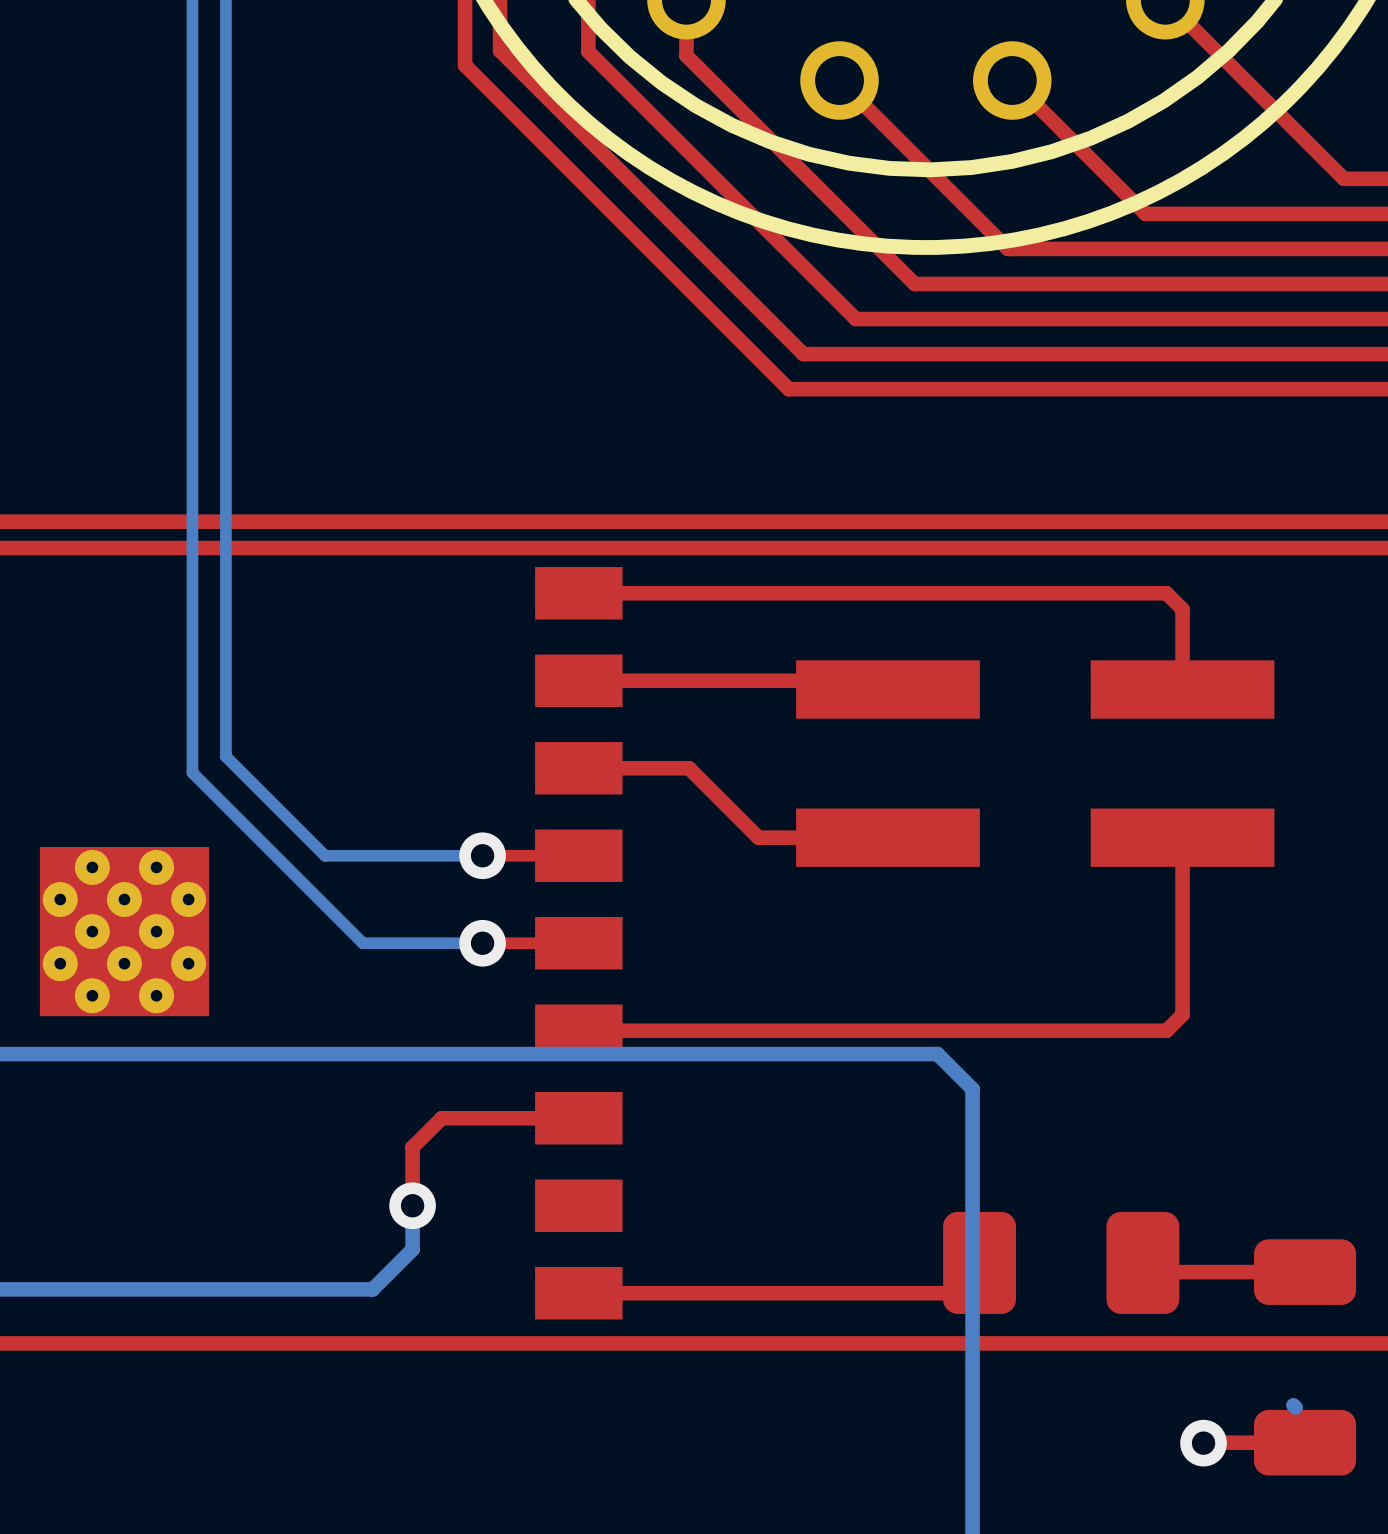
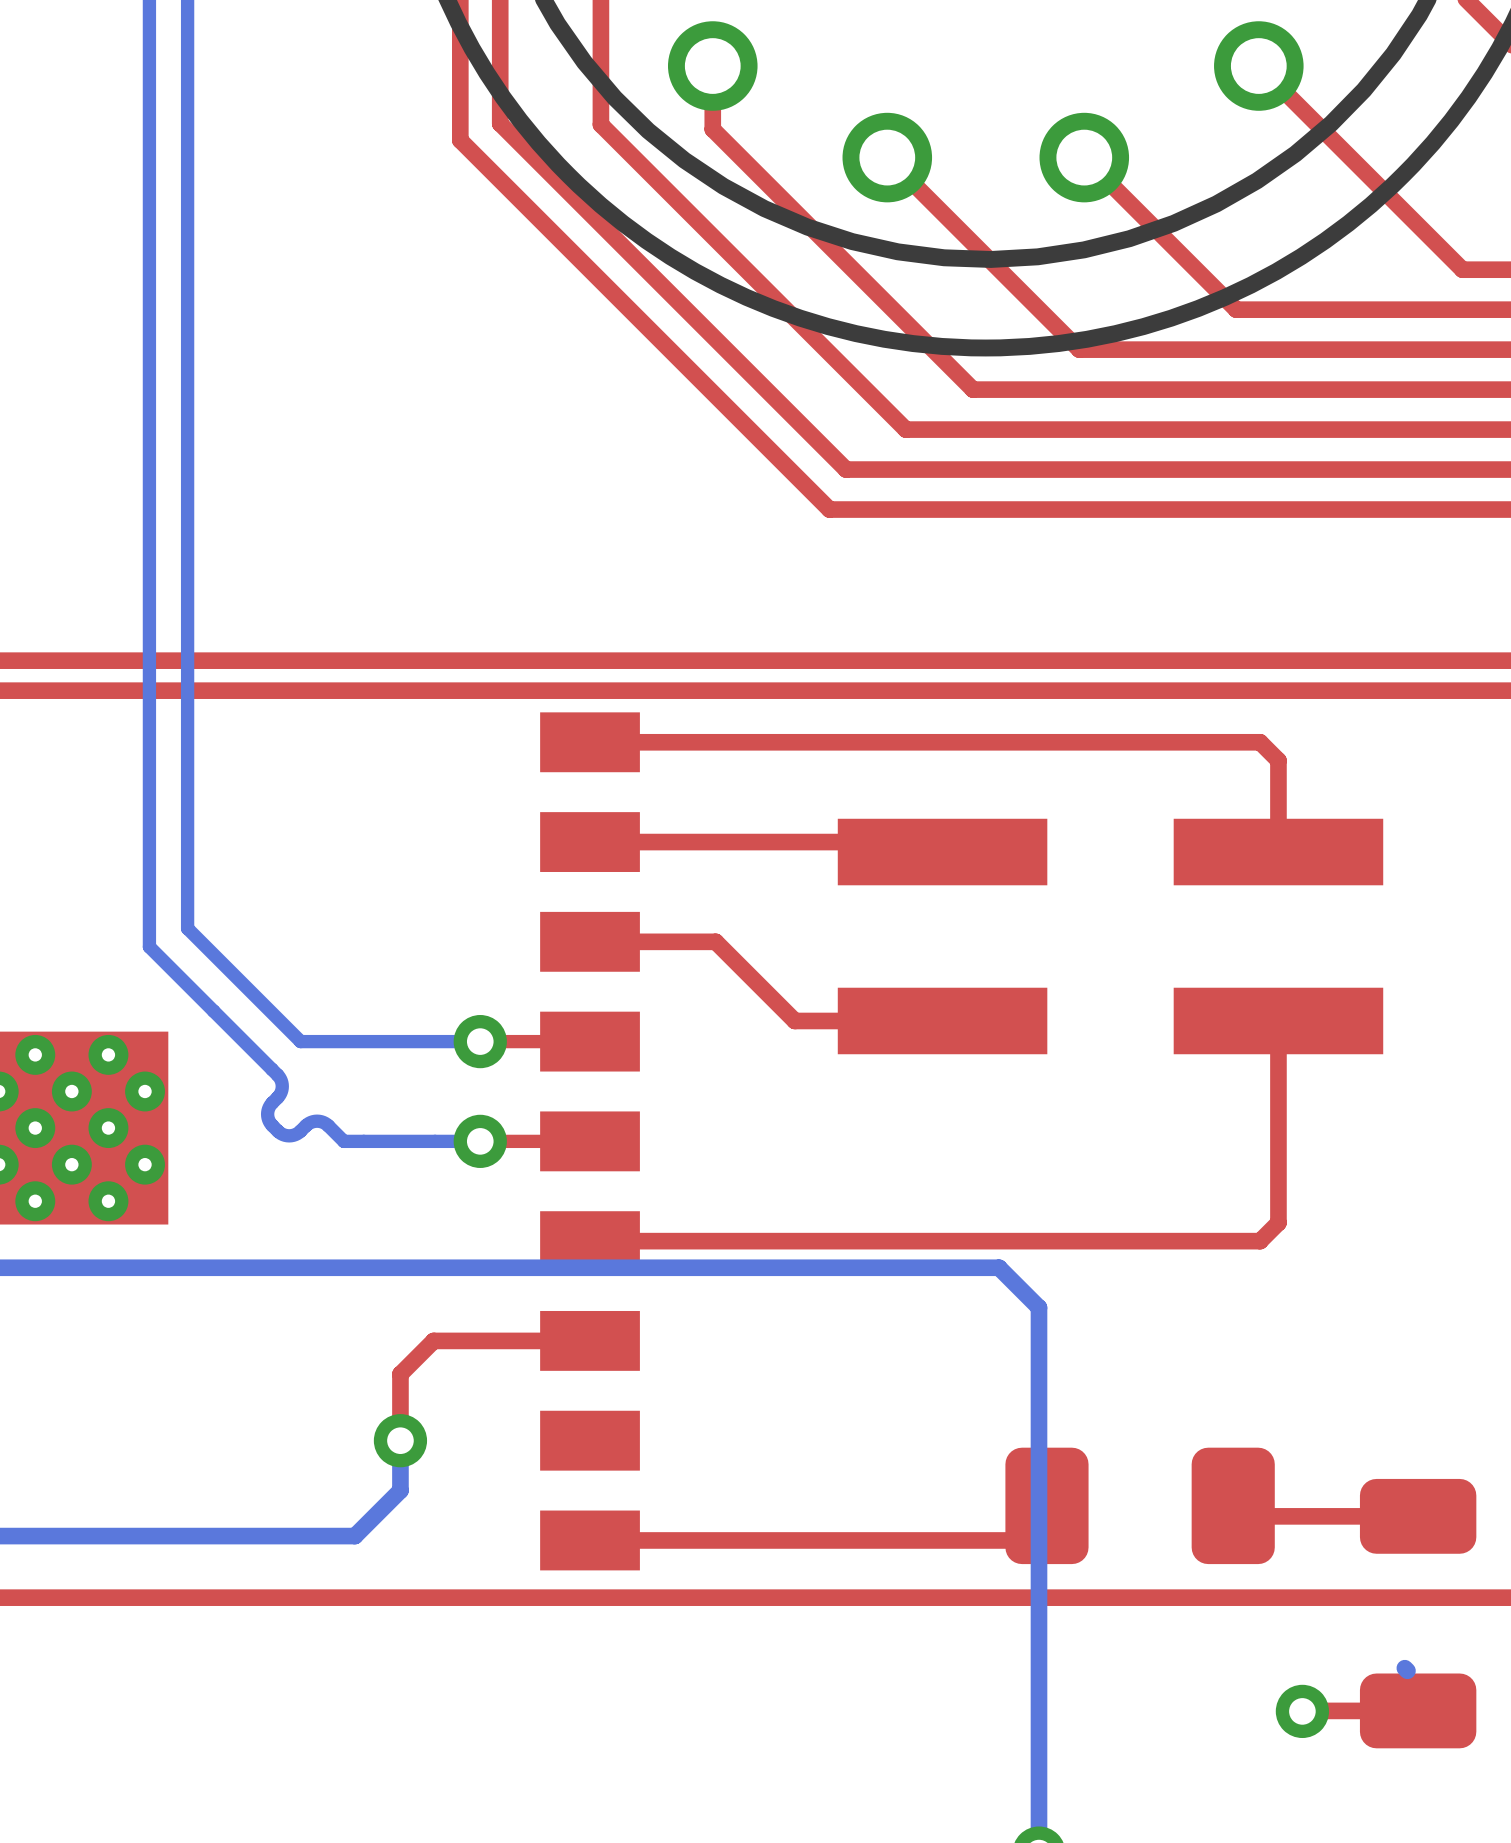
bottom track: (304, 885) (349, 929) -> (277, 1075) (281, 1081) (281, 1089) (270, 1105) (267, 1114) (270, 1122) (277, 1131) (283, 1134) (291, 1135) (297, 1133) (312, 1121) (321, 1121) (328, 1125)

